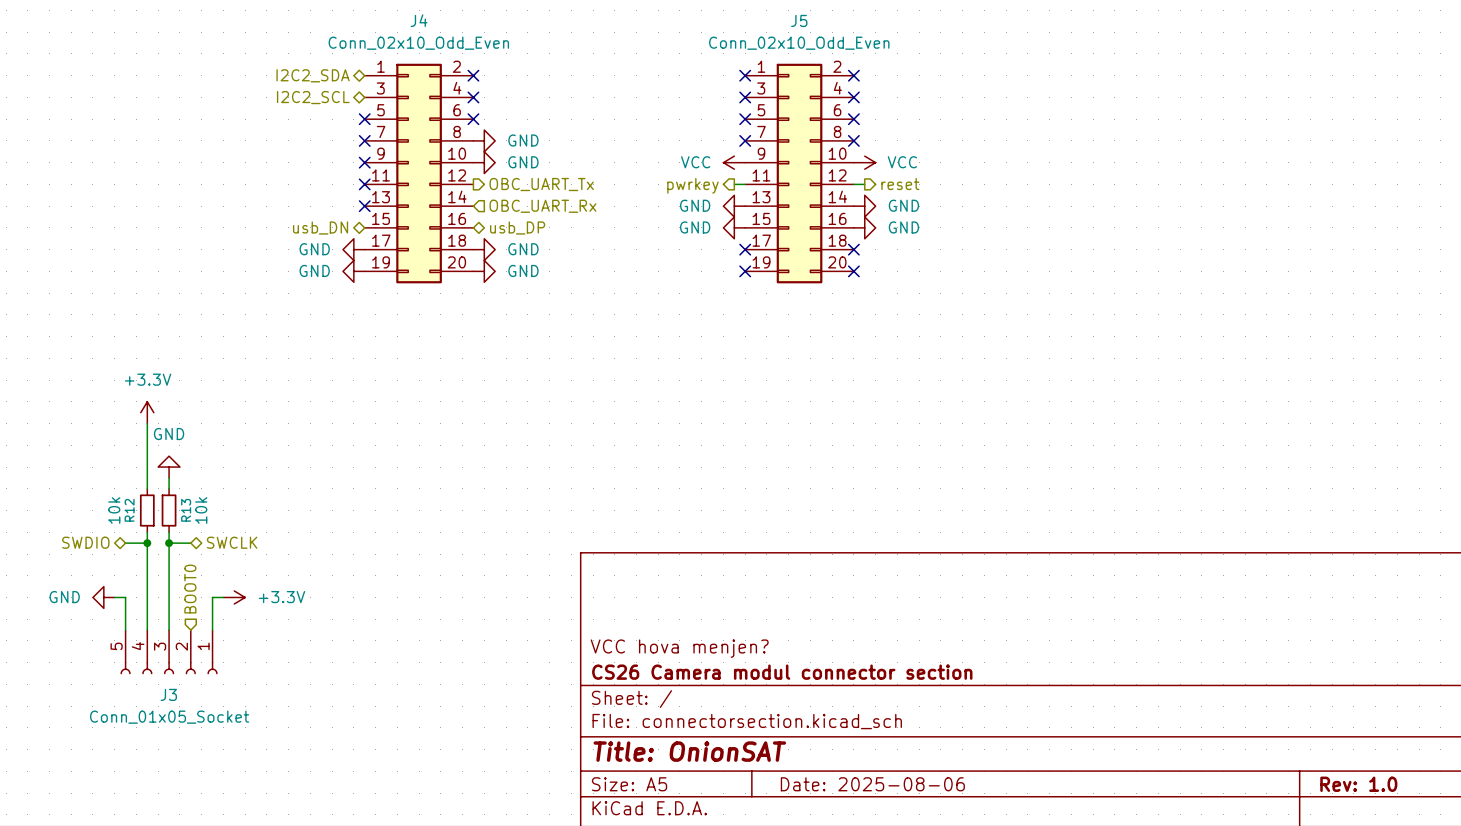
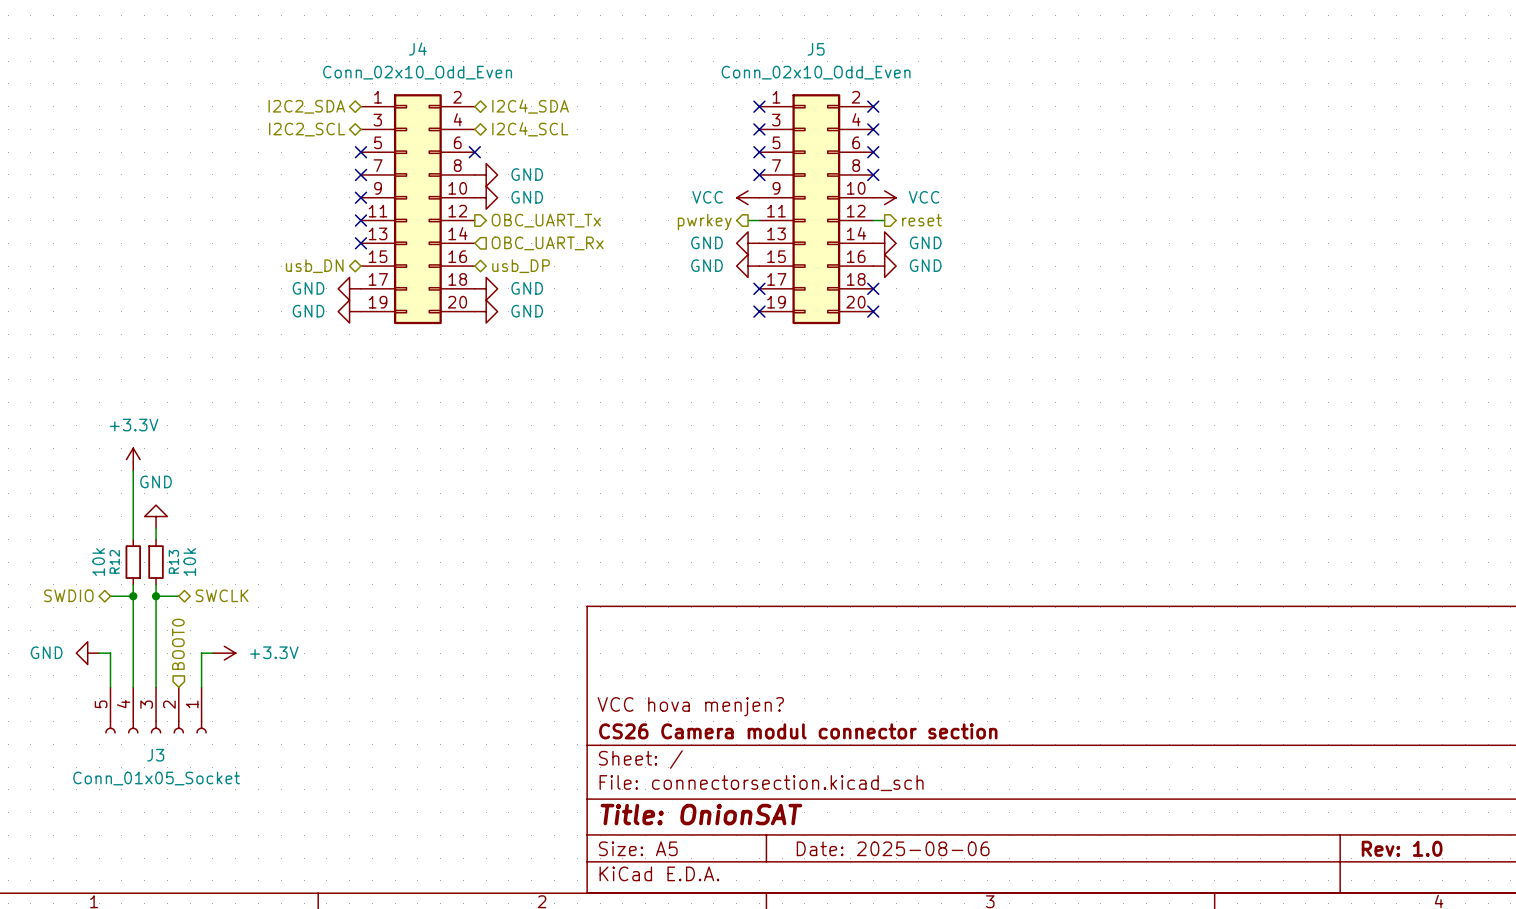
no-connect mark: (473, 75) -> none
hierarchical label: none -> I2C4_SDA (530, 106)
no-connect mark: (473, 97) -> none
hierarchical label: none -> I2C4_SCL (530, 129)

